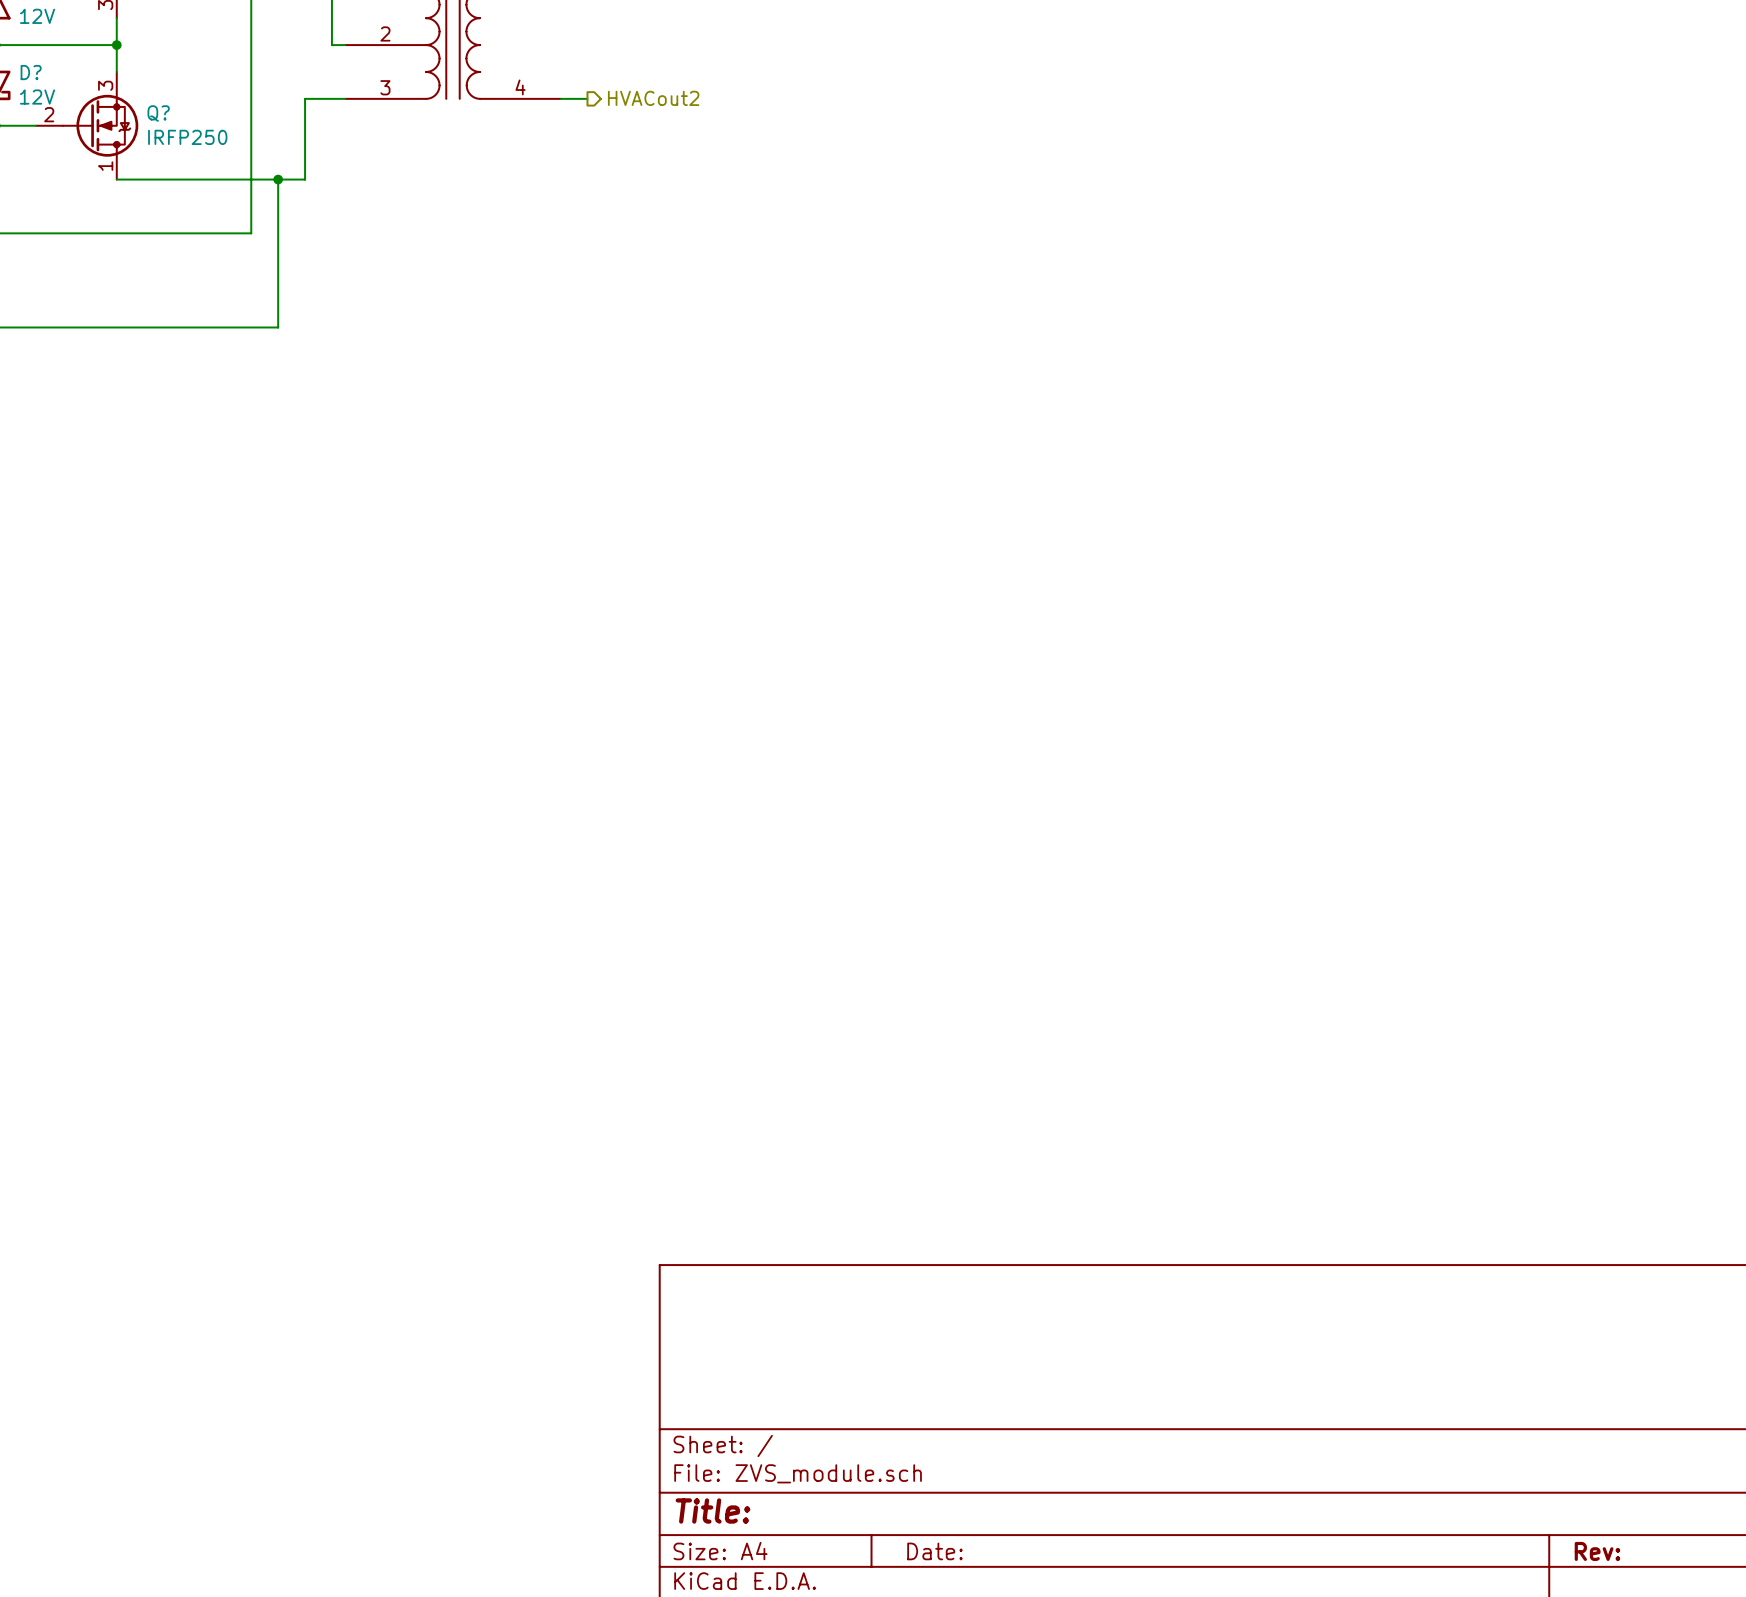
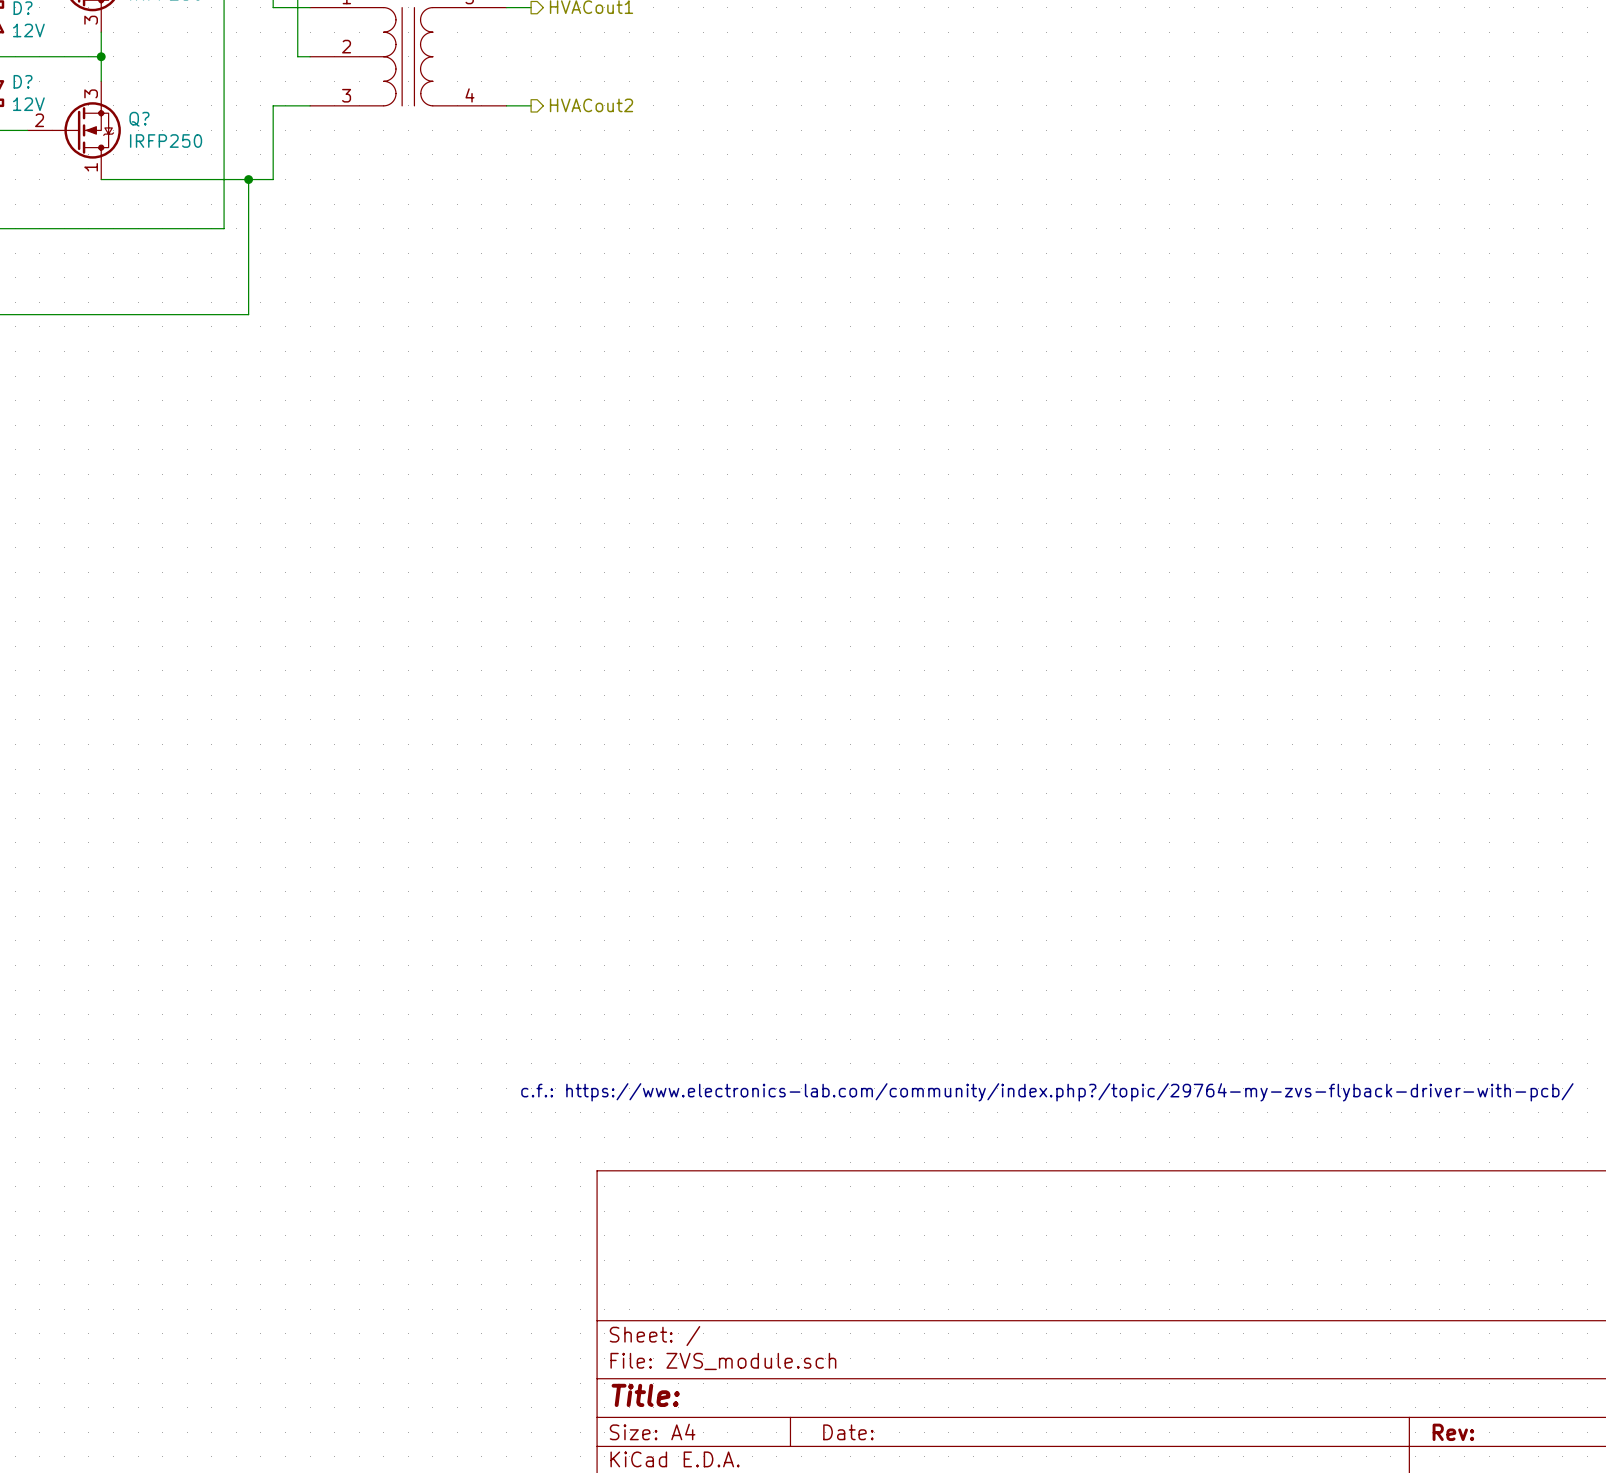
text: none -> c.f.: https://www.electronics-lab.com/community/index.php?/topic/29764-my-zvs-flyback-driver-with-pcb/ (1047, 1092)

